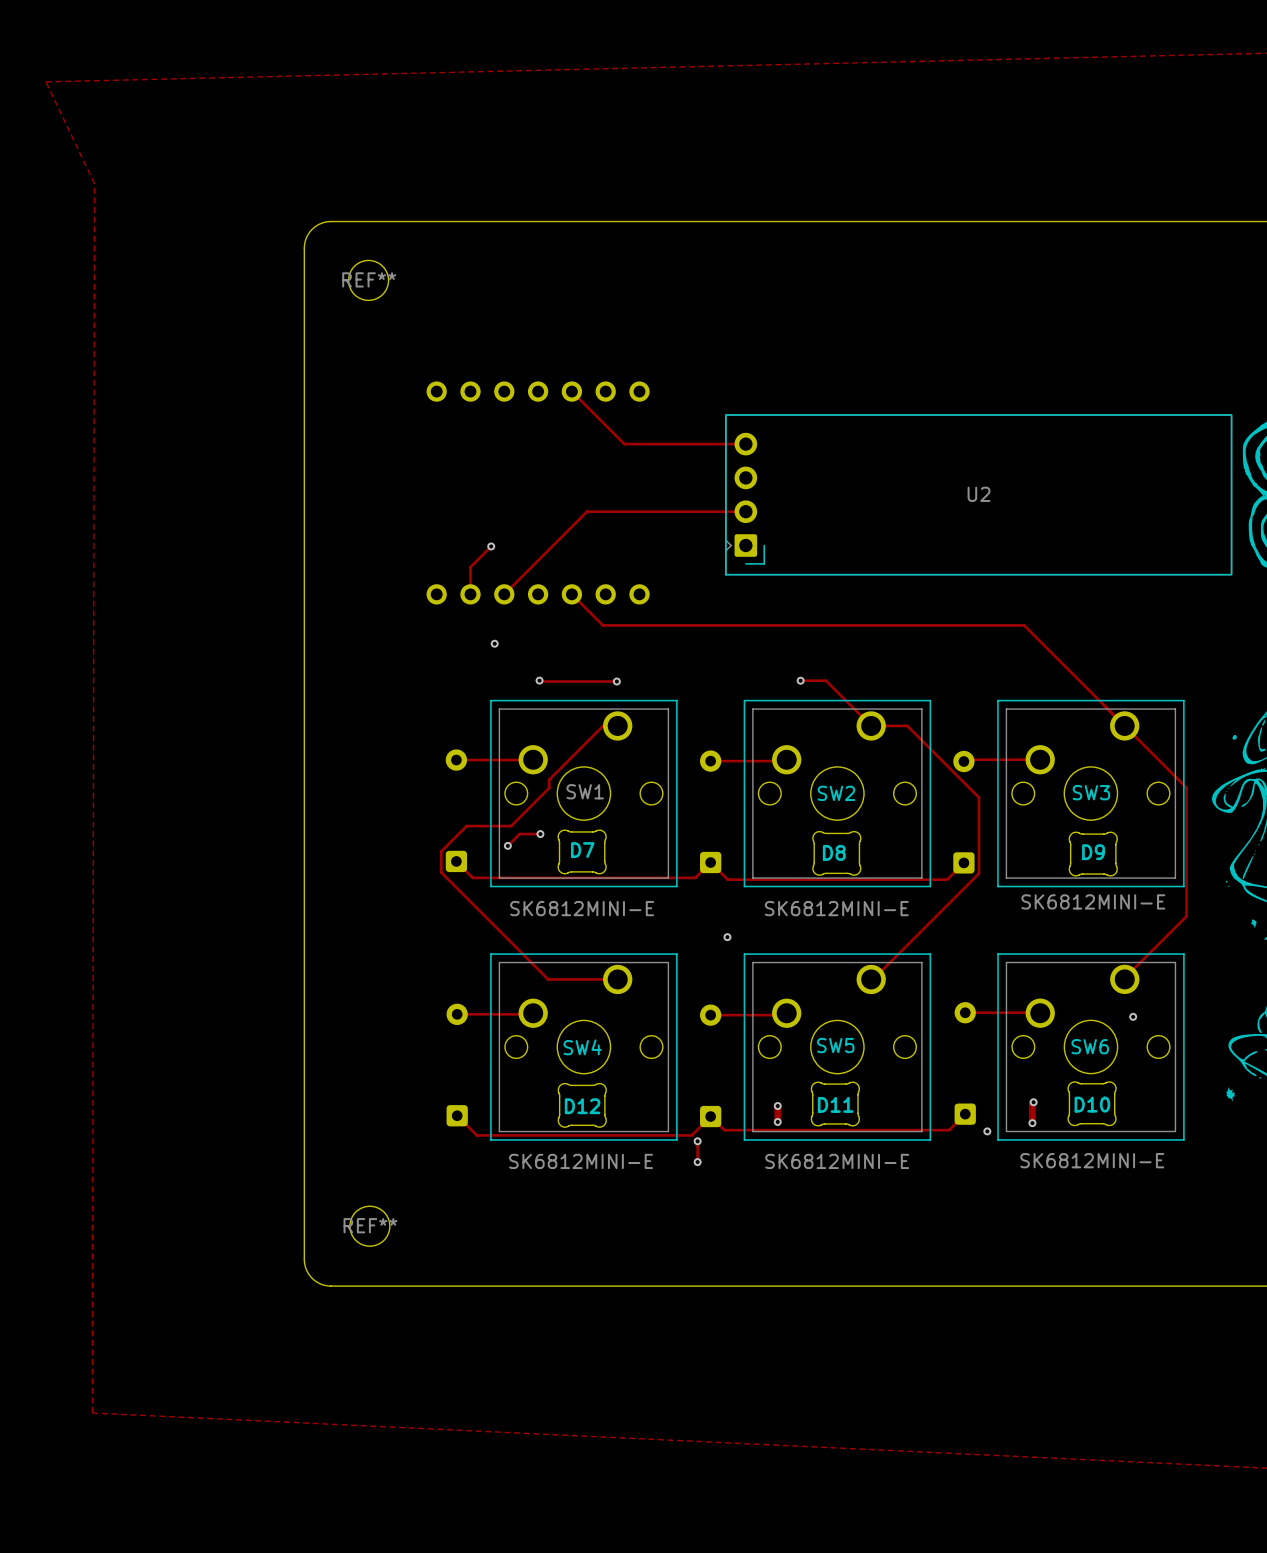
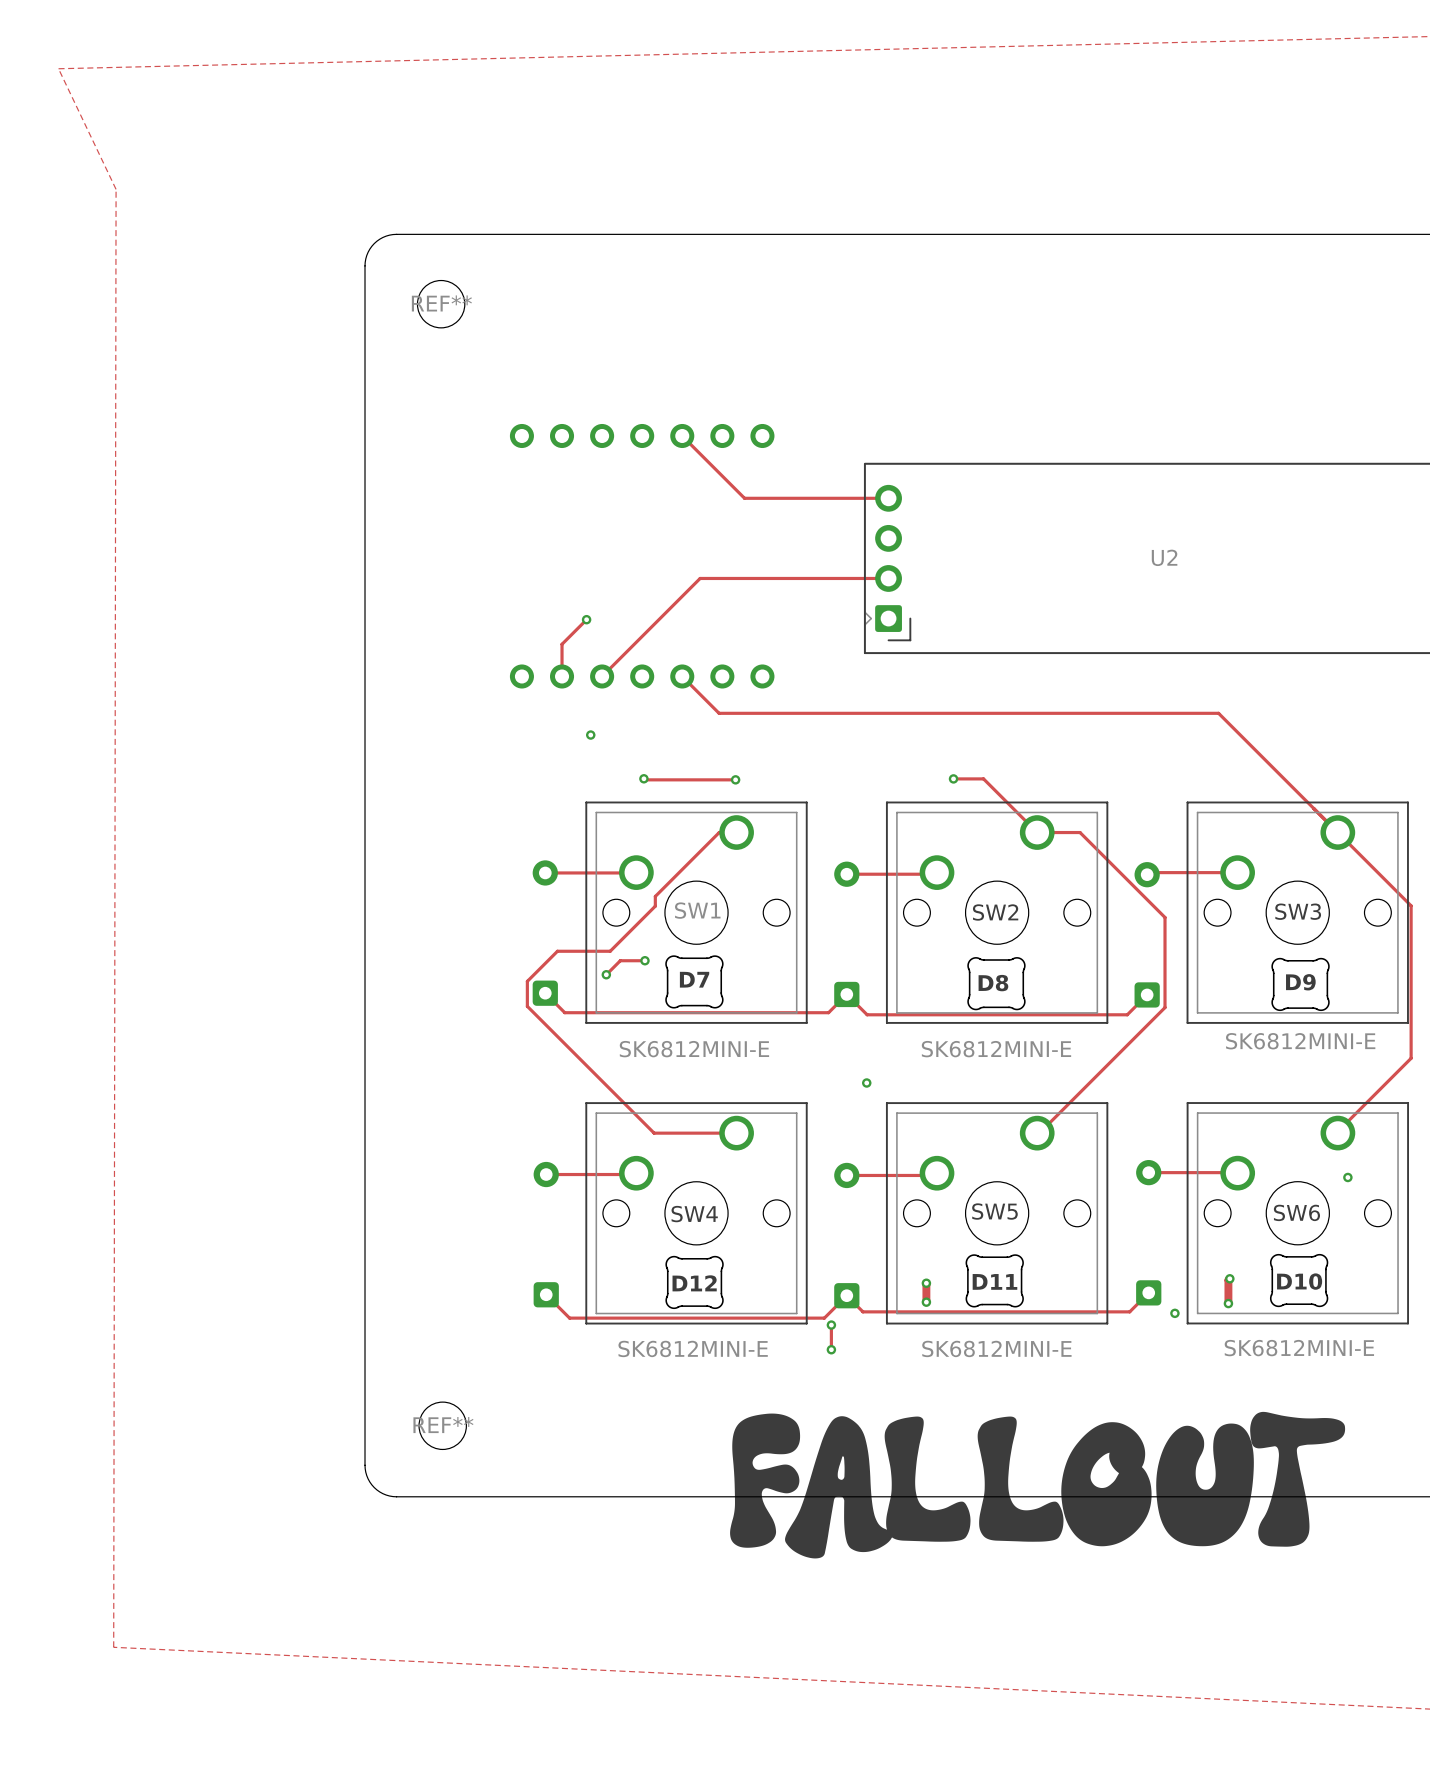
drawing: none -> [730, 1411, 1346, 1559]

